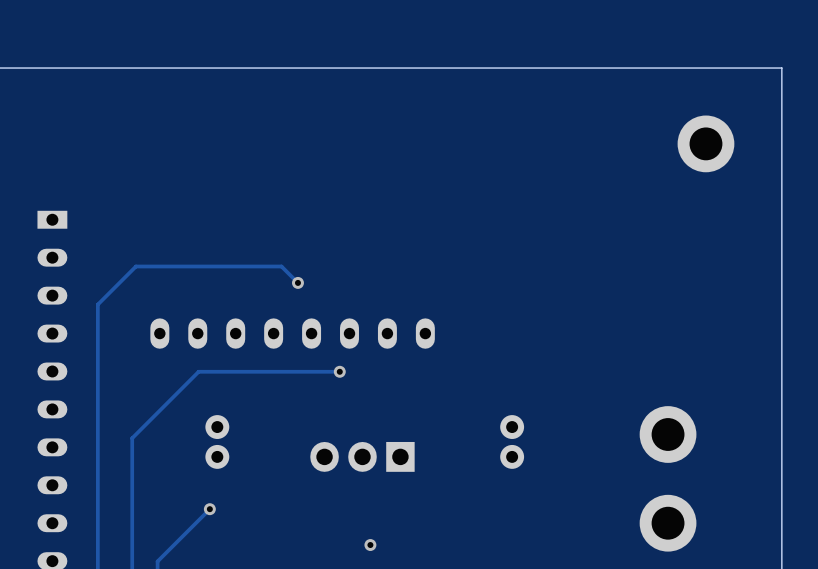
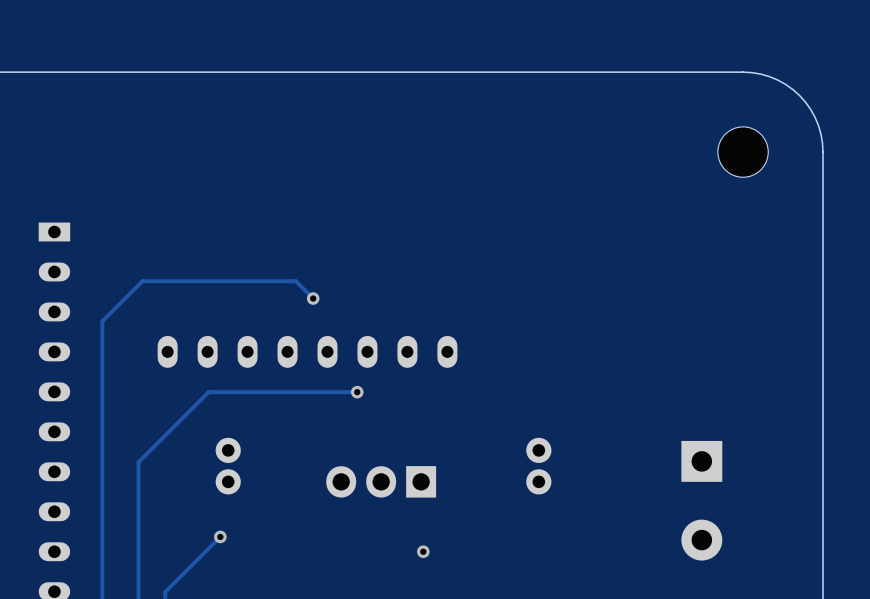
board edge: (705, 68) (781, 68) (781, 143) -> (743, 72) (760, 74) (777, 80) (799, 95) (810, 109) (818, 125) (822, 152)
part footprint: [677, 115, 735, 173] -> [717, 126, 769, 178]
part: (668, 434) -> none
part: none -> (701, 500)
part: (668, 523) -> none
via position: (370, 545) -> (423, 551)

